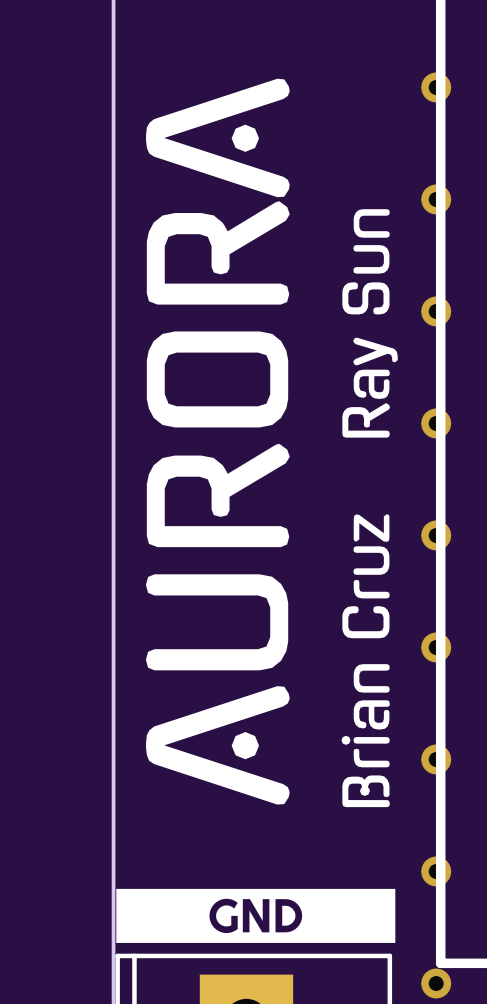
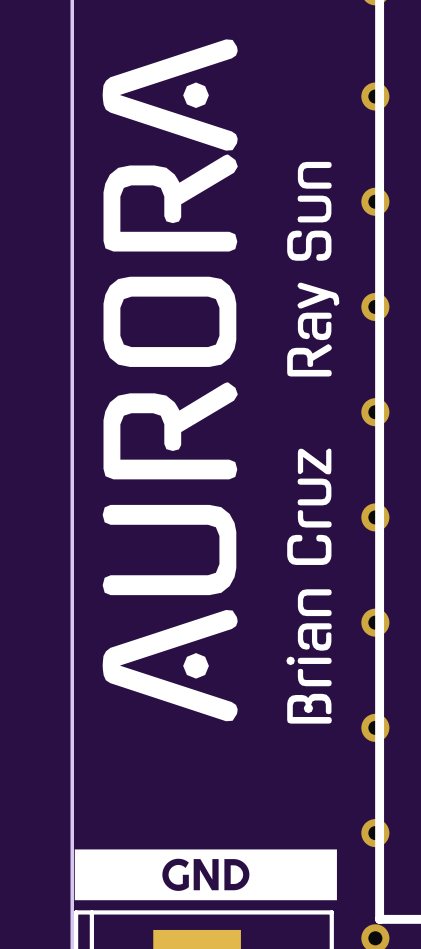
drawing position: (217, 441) -> (170, 380)
drawing position: (369, 508) -> (312, 442)

